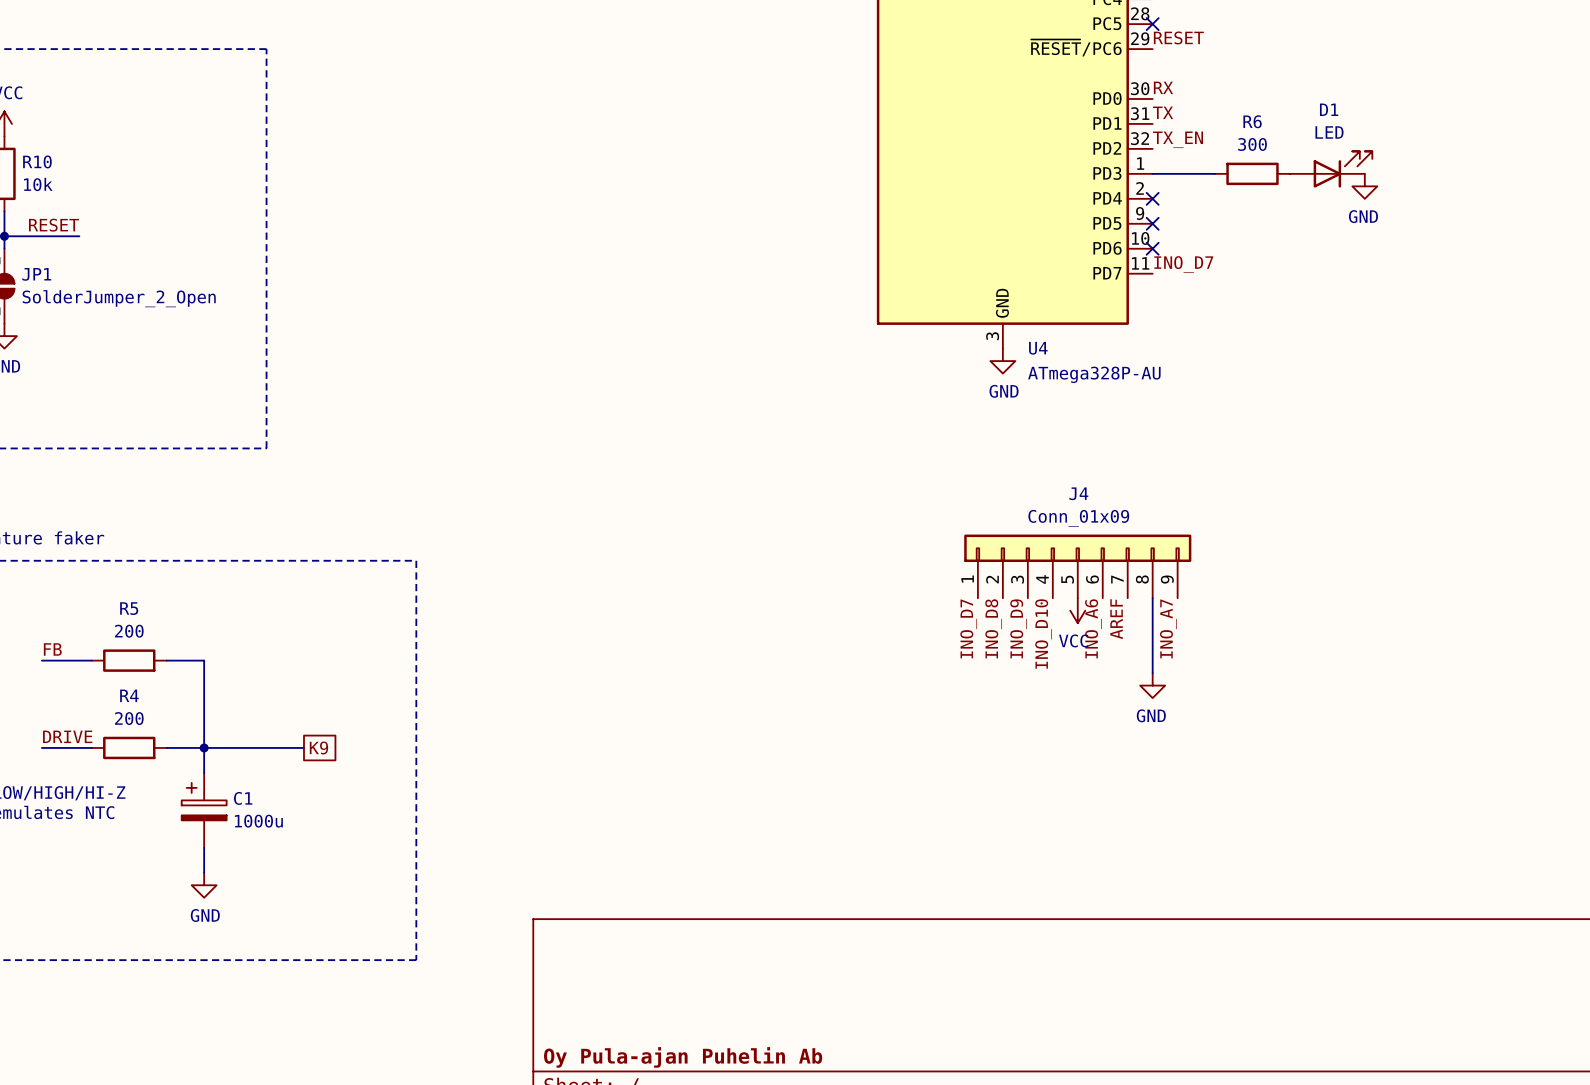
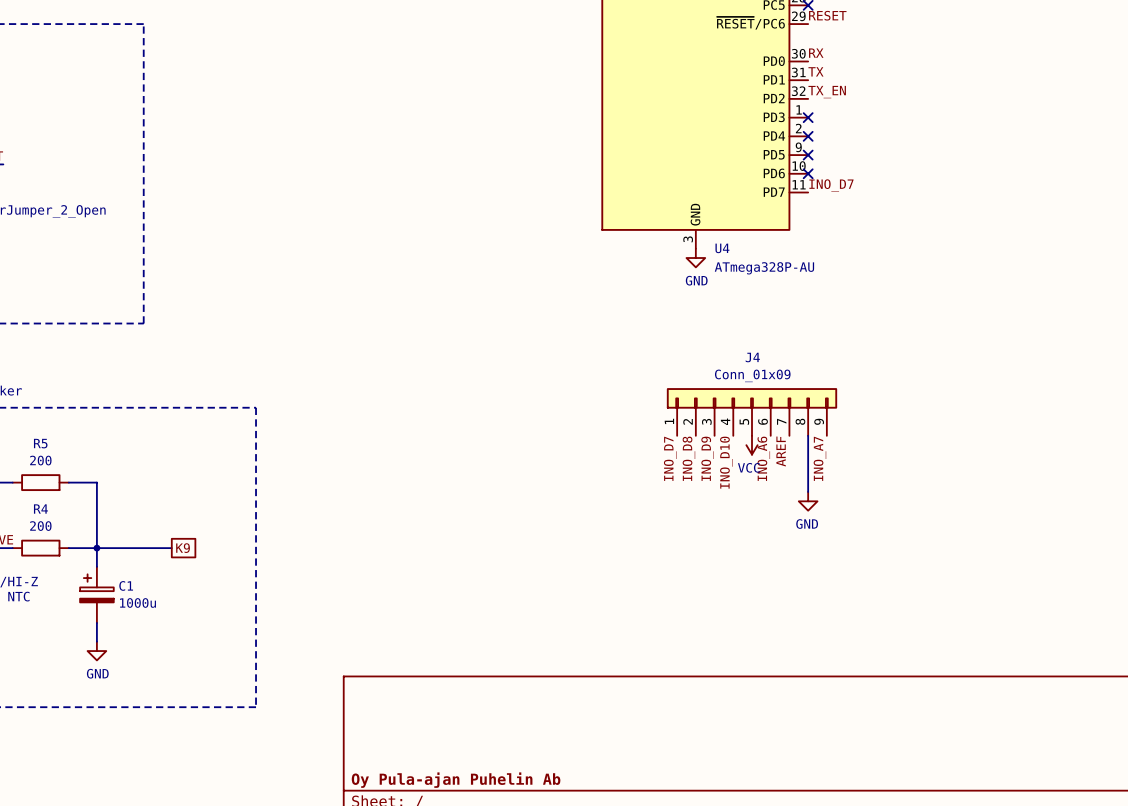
D1: LED (1331, 169) -> none
wire: (1152, 173) (1215, 173) -> none
no-connect mark: none -> (808, 117)
R6: 300 (1252, 173) -> none
power symbol: GND (1364, 186) -> none

